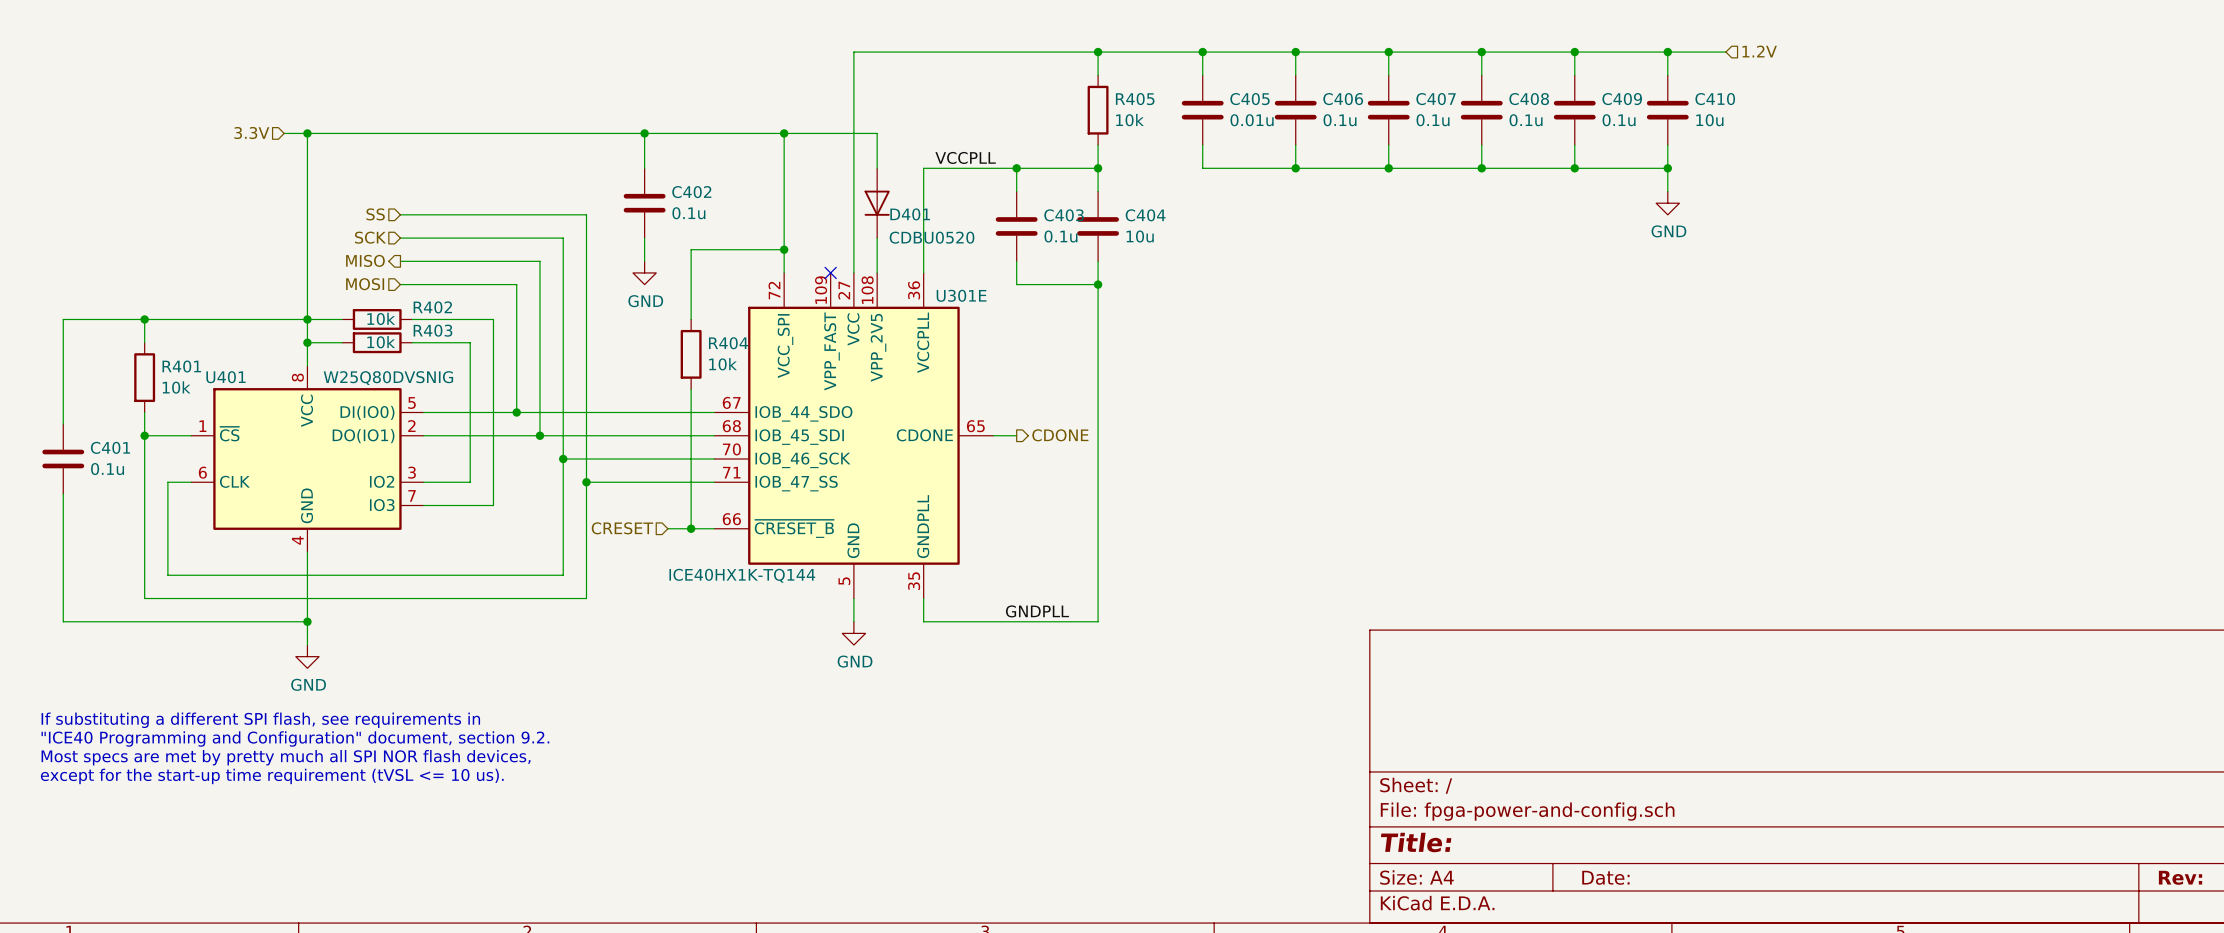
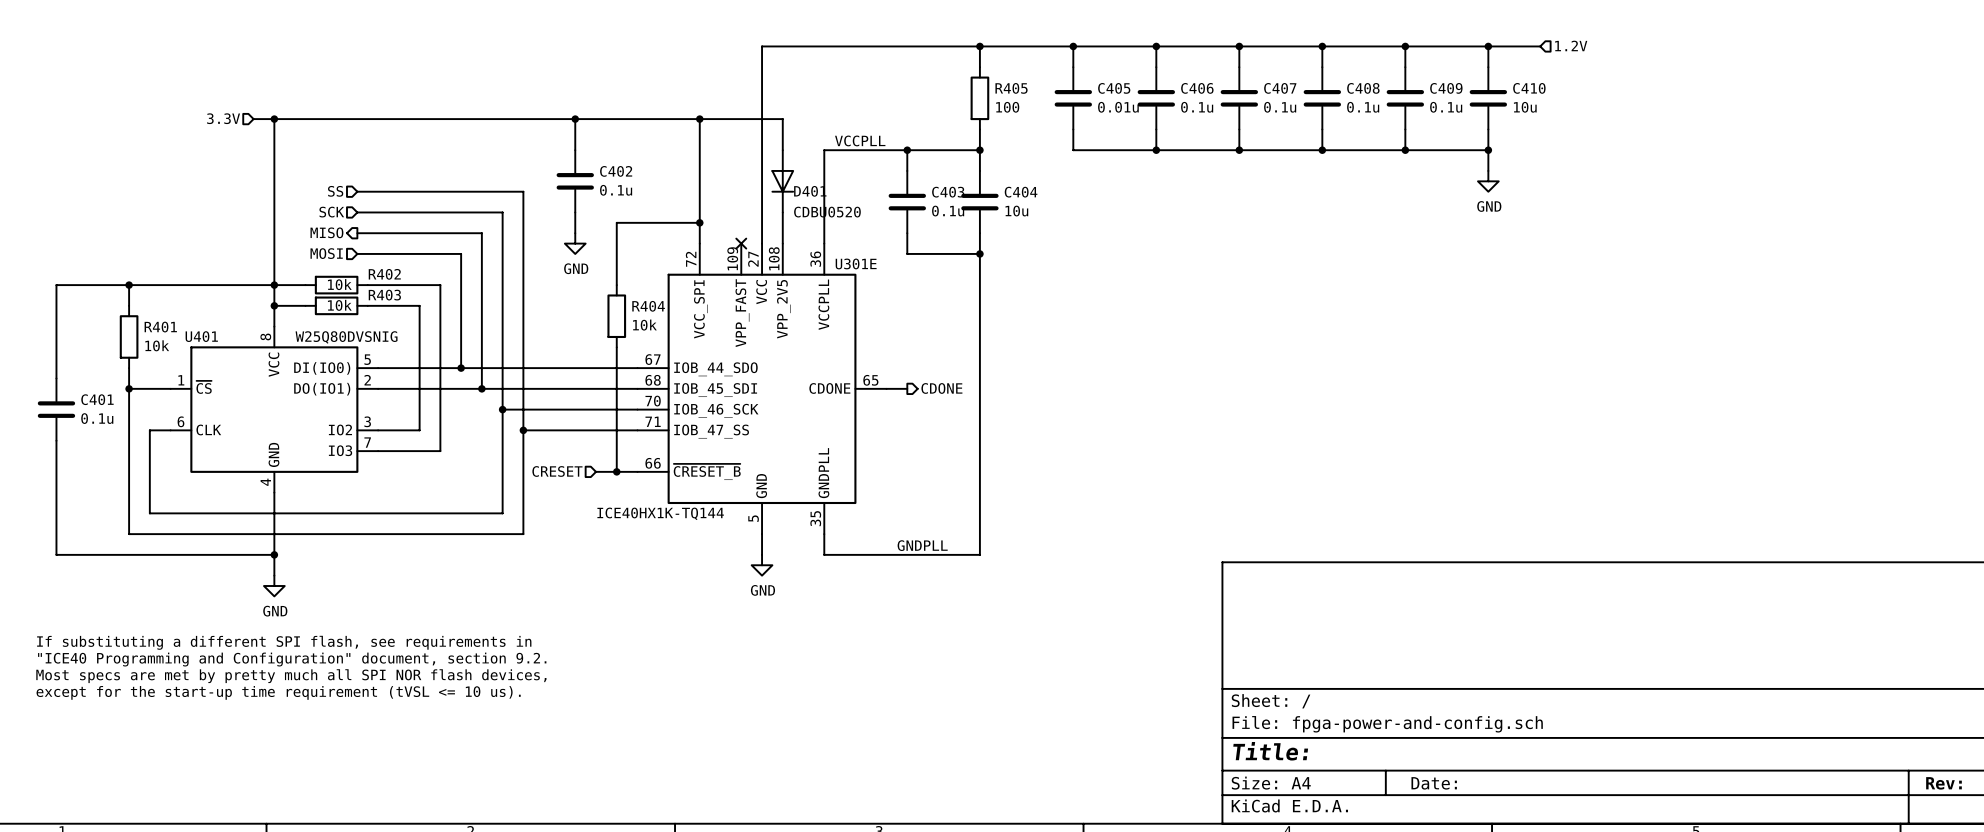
R405 value: 10k (1129, 120) -> 100 (1007, 107)

